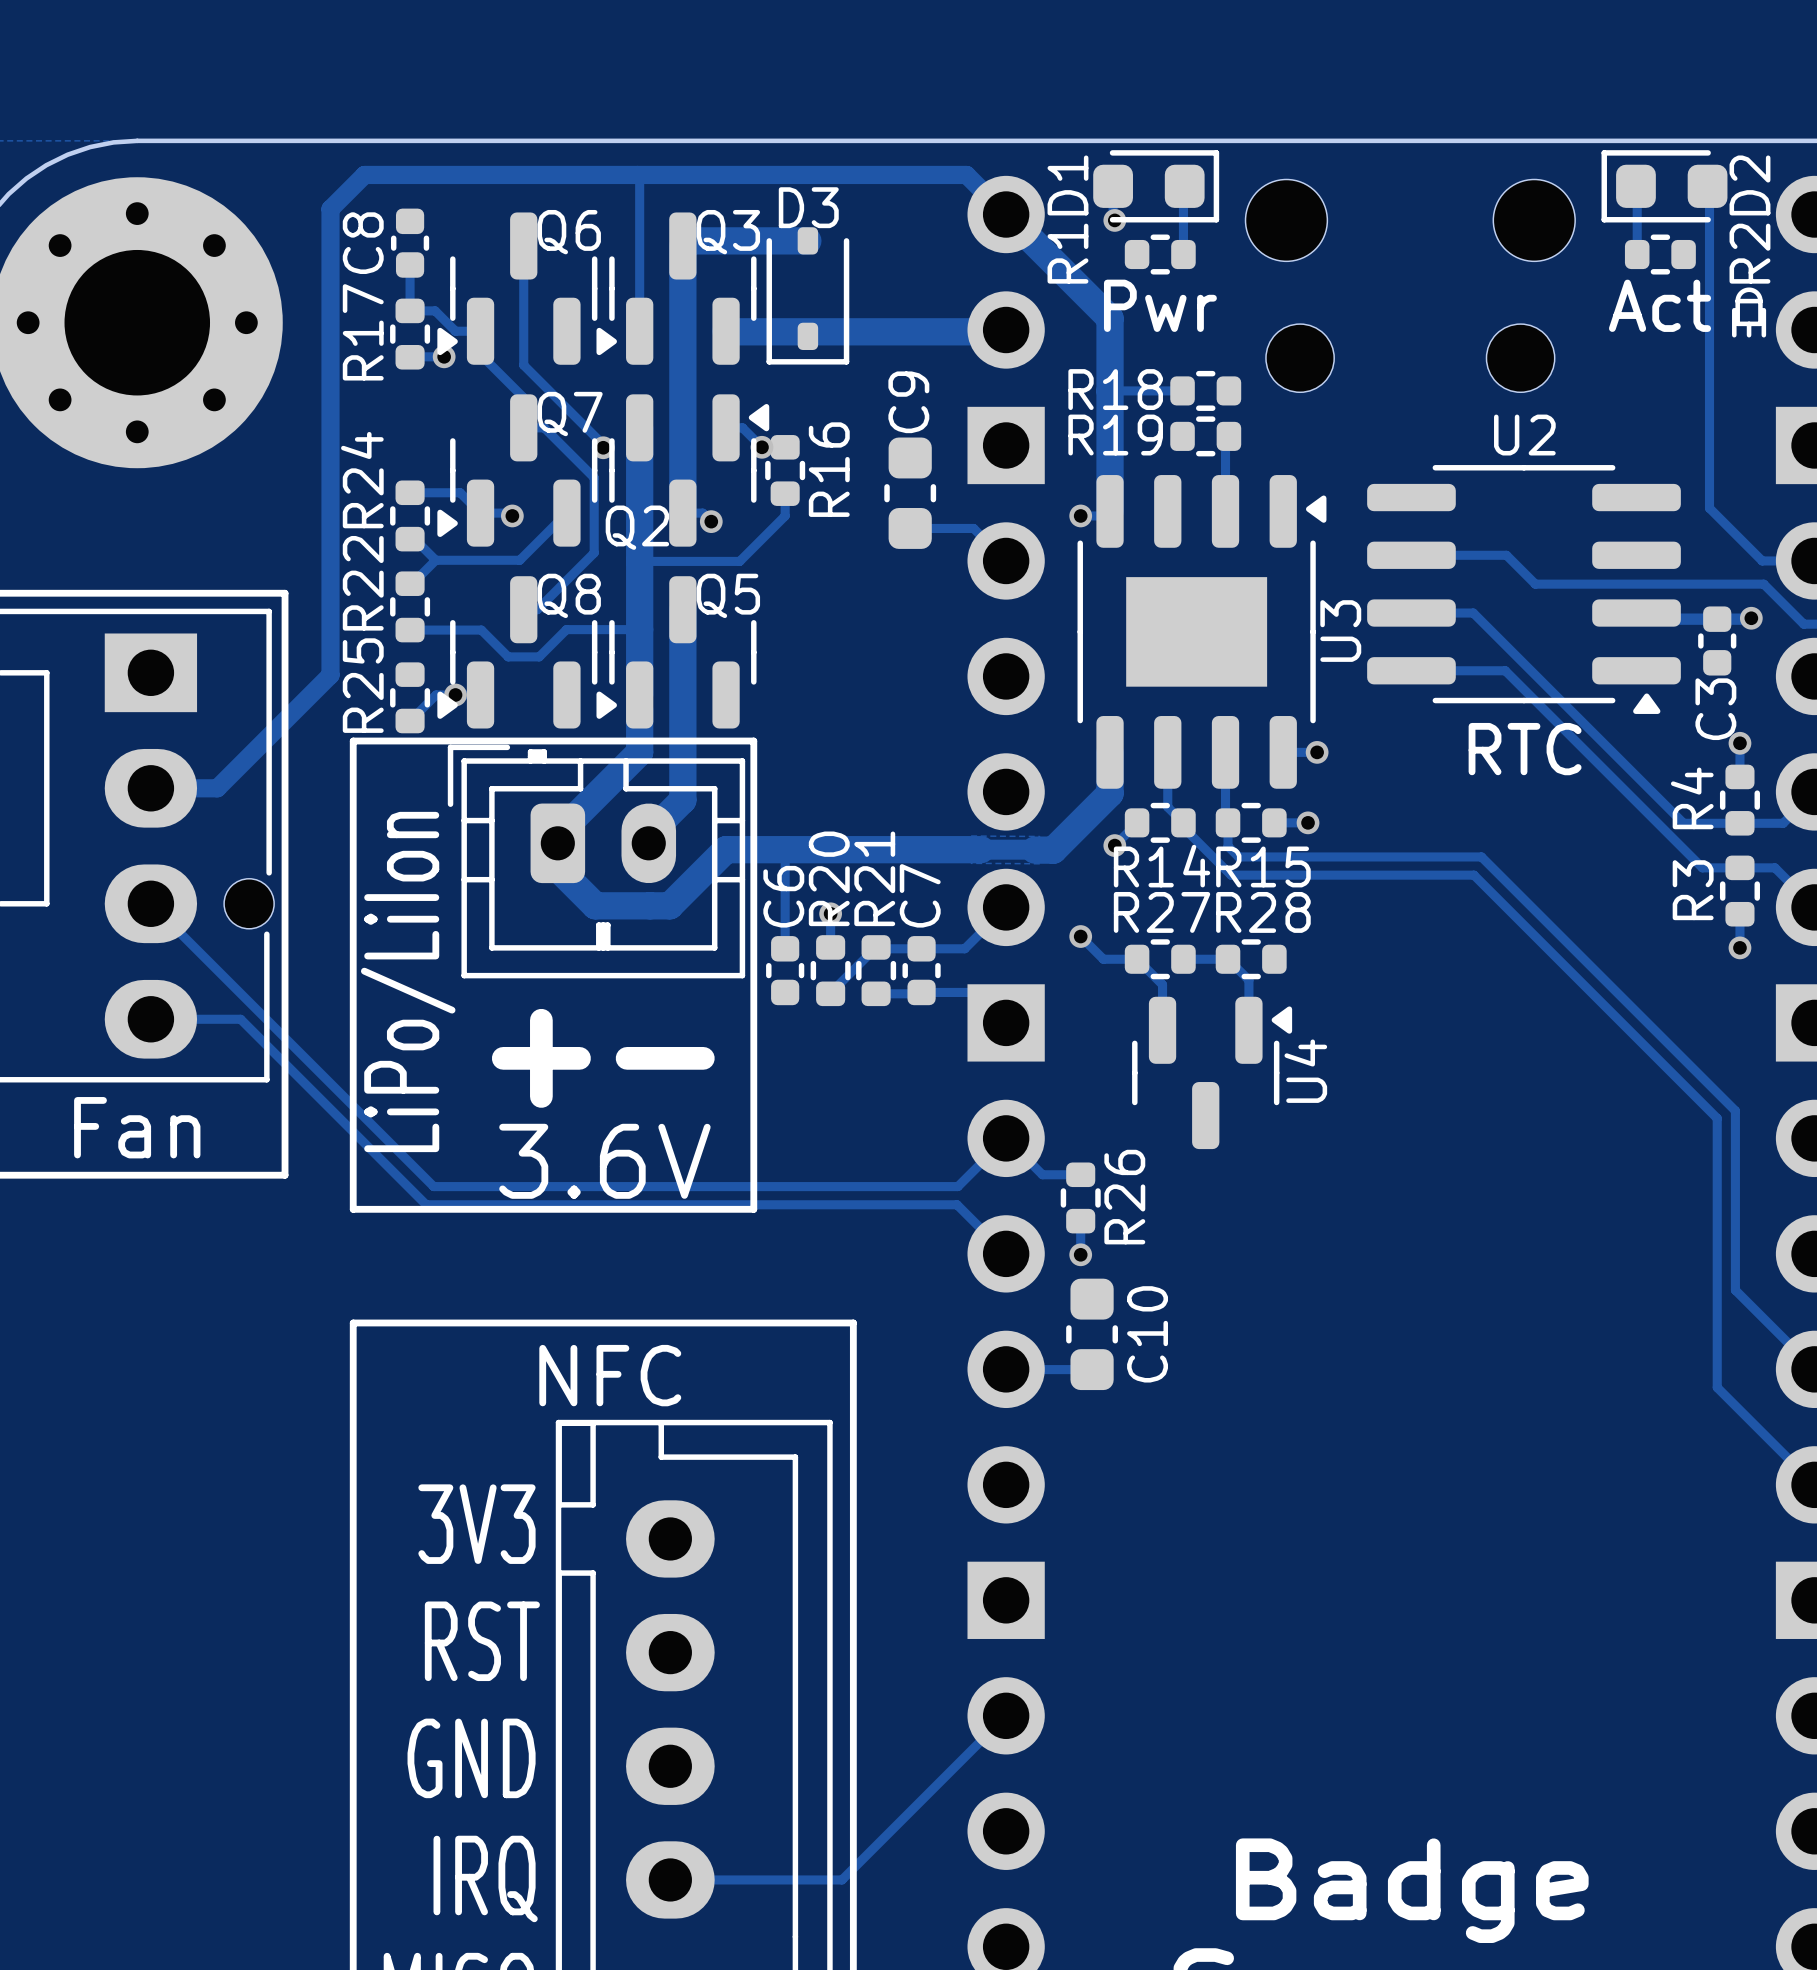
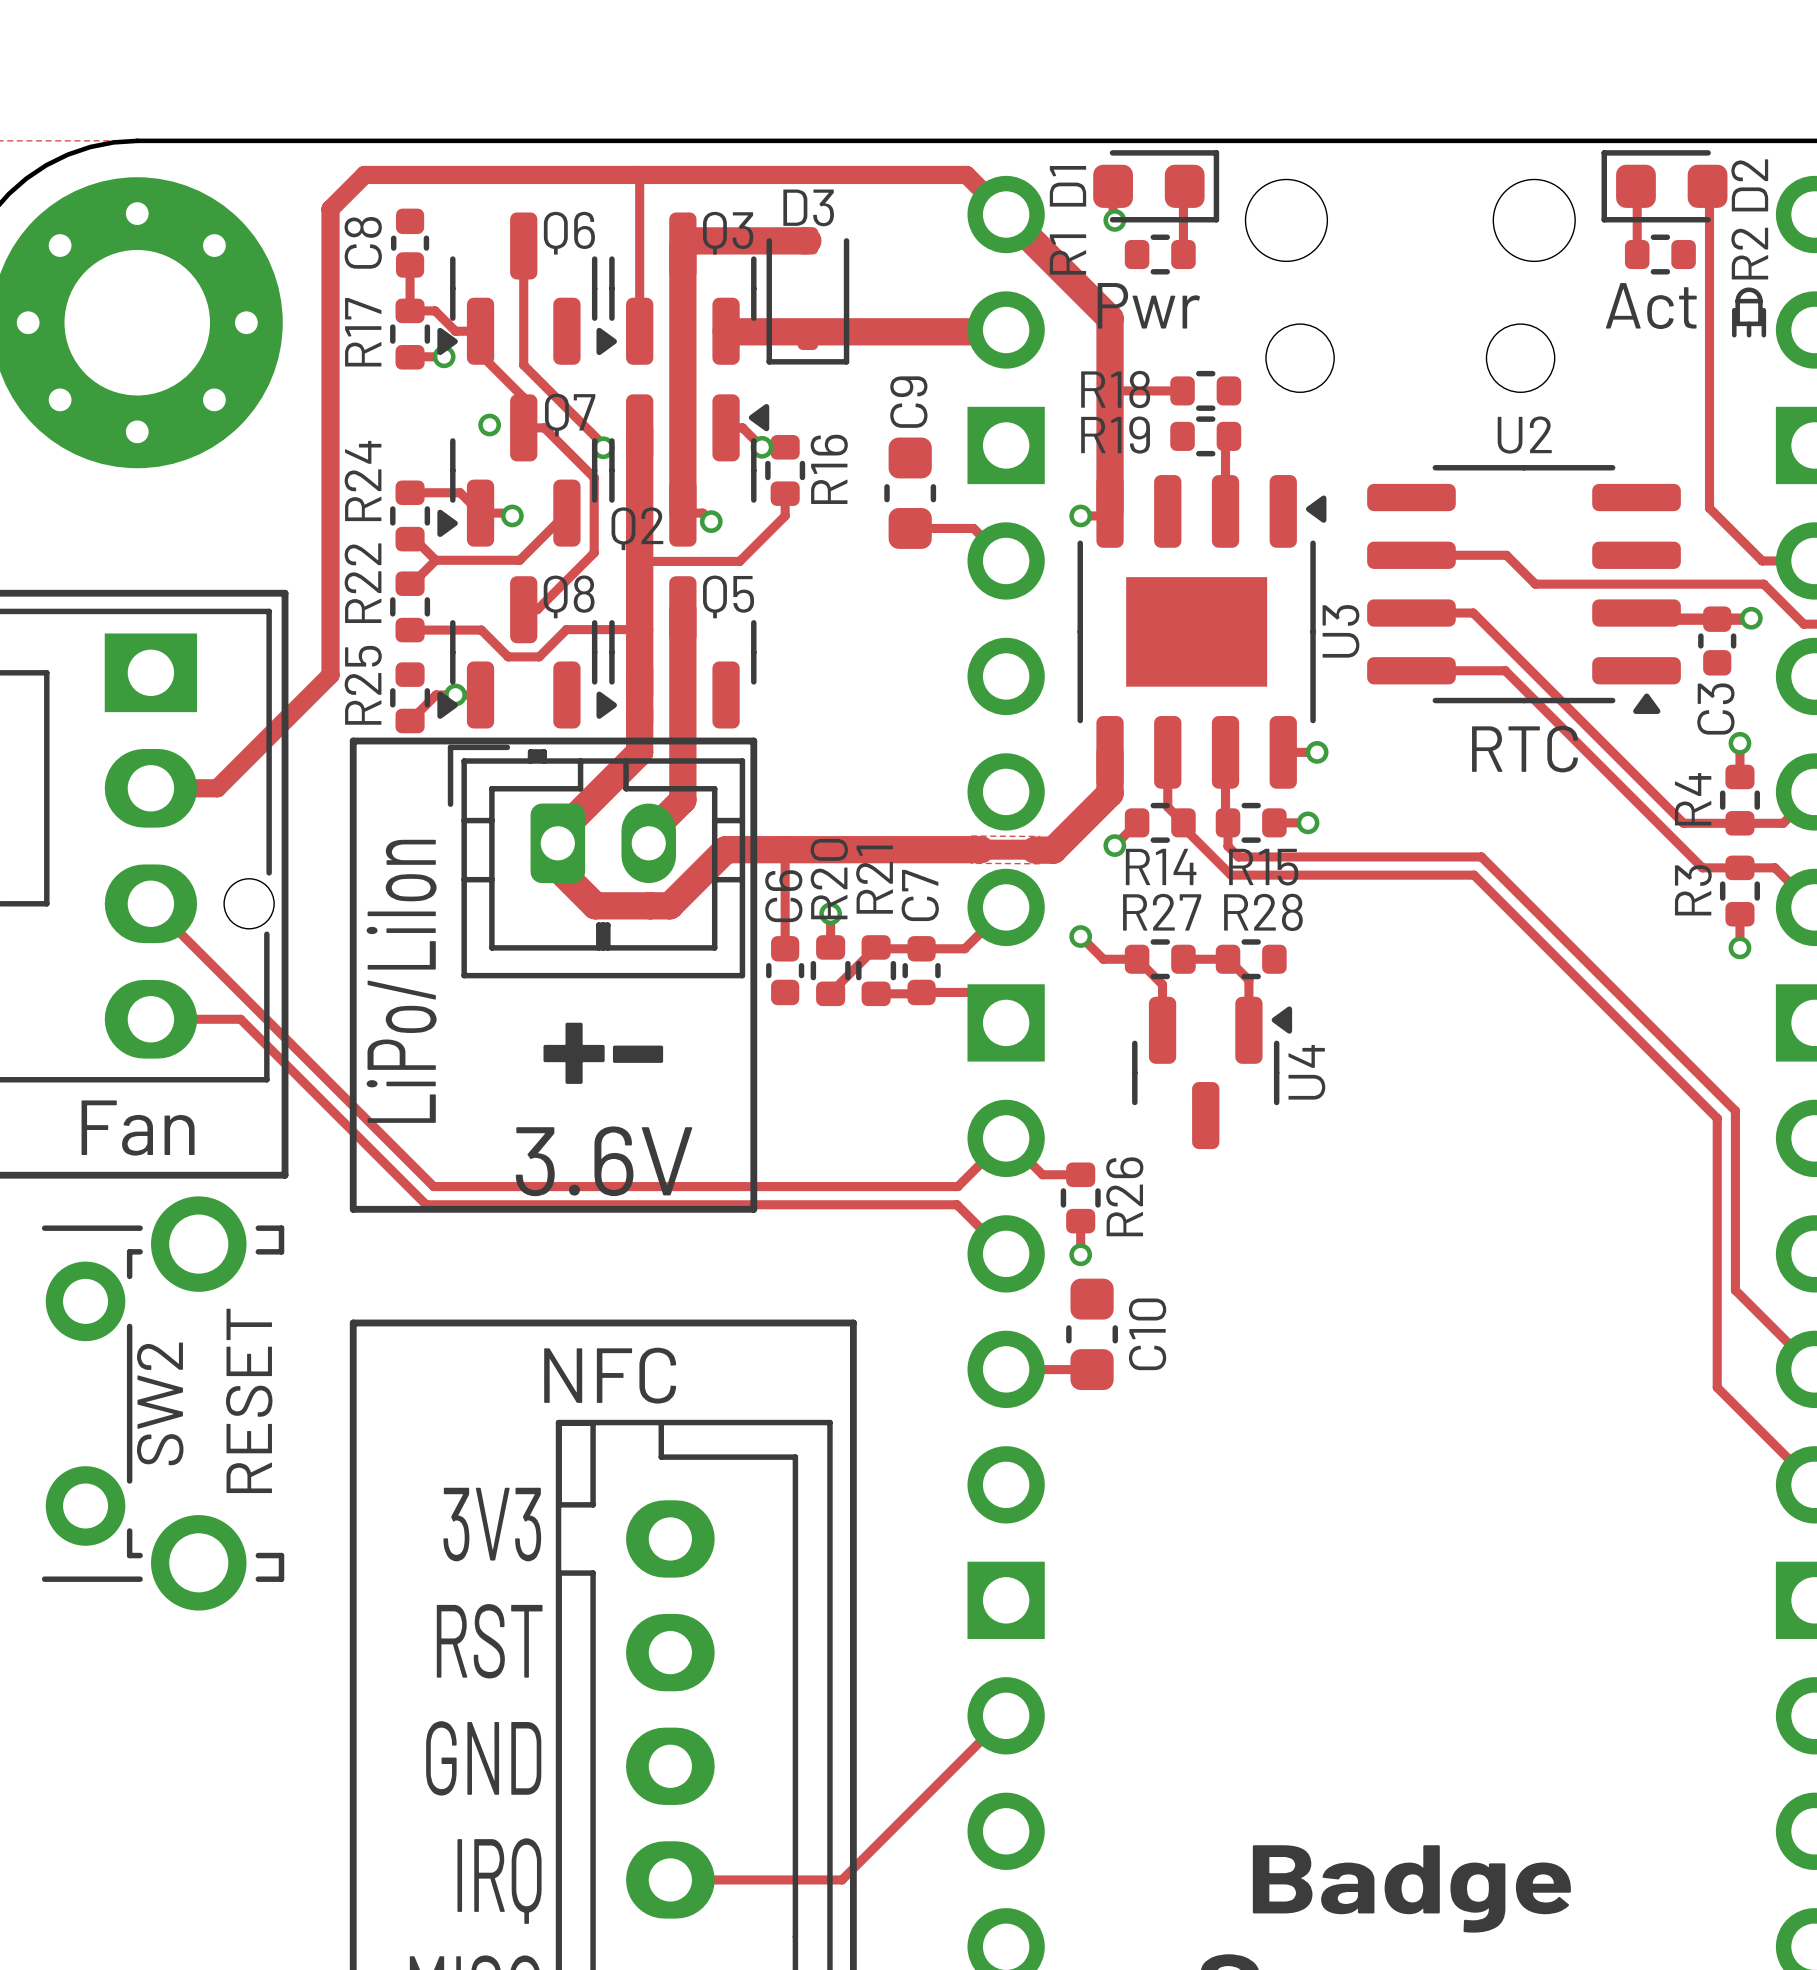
via: none -> (489, 425)
text: none -> RESET (249, 1400)
SW2: none -> (163, 1403)

